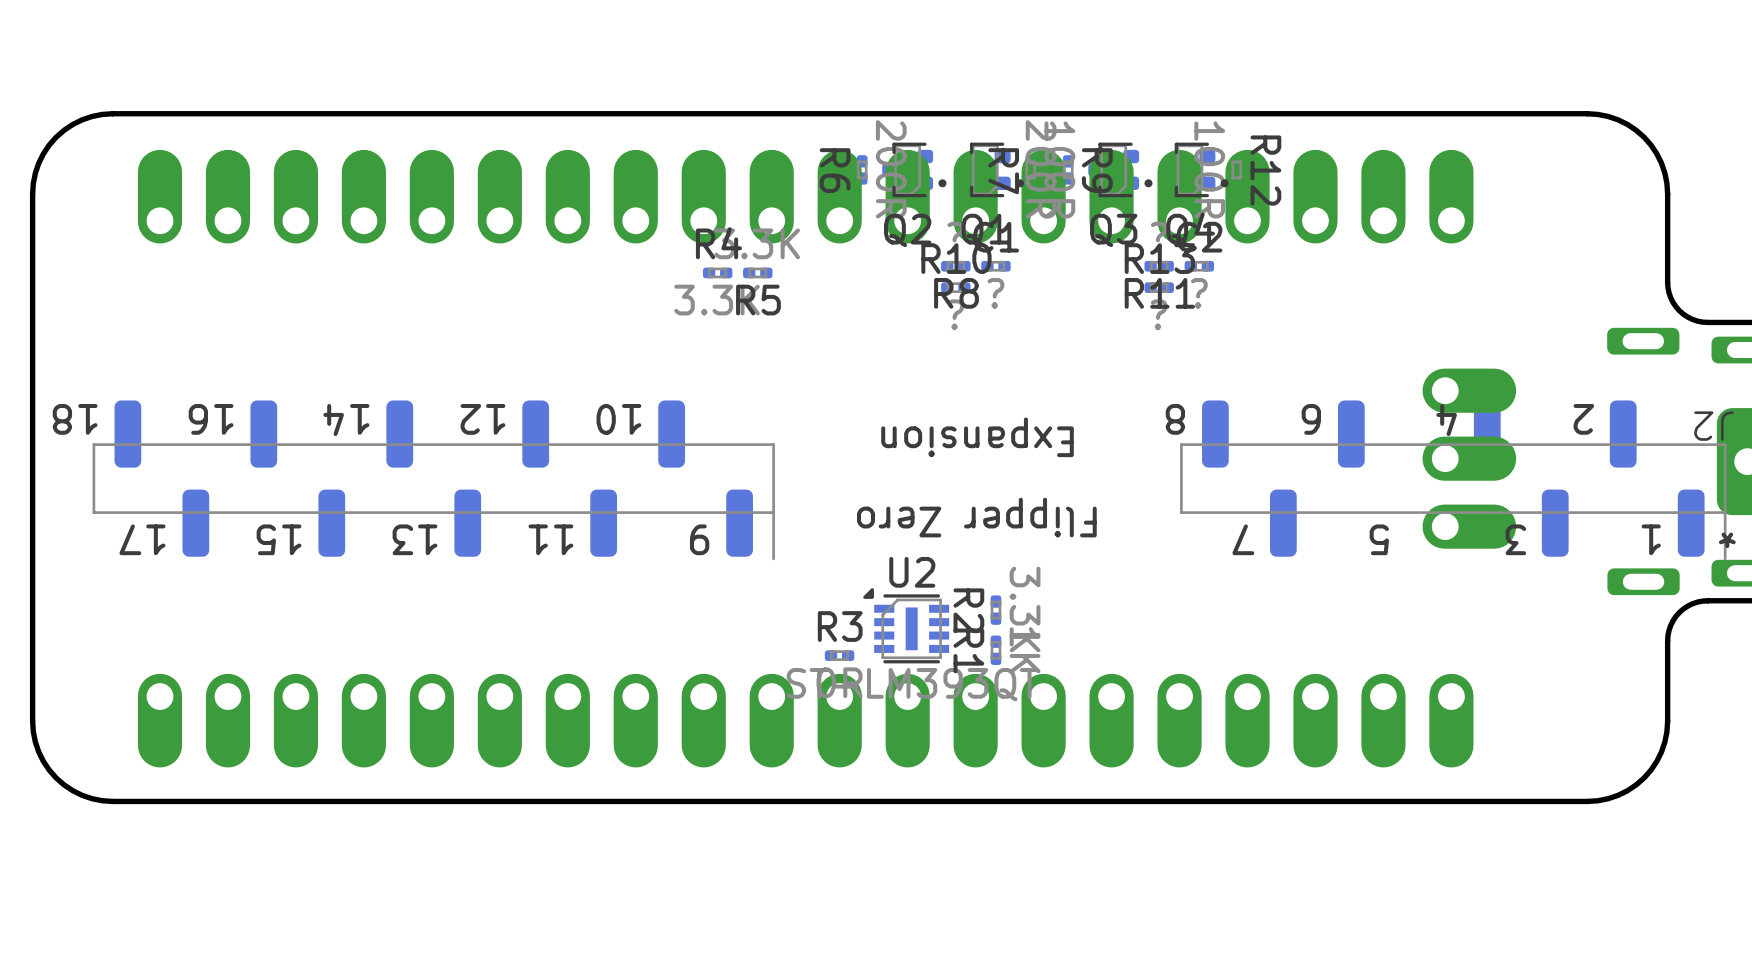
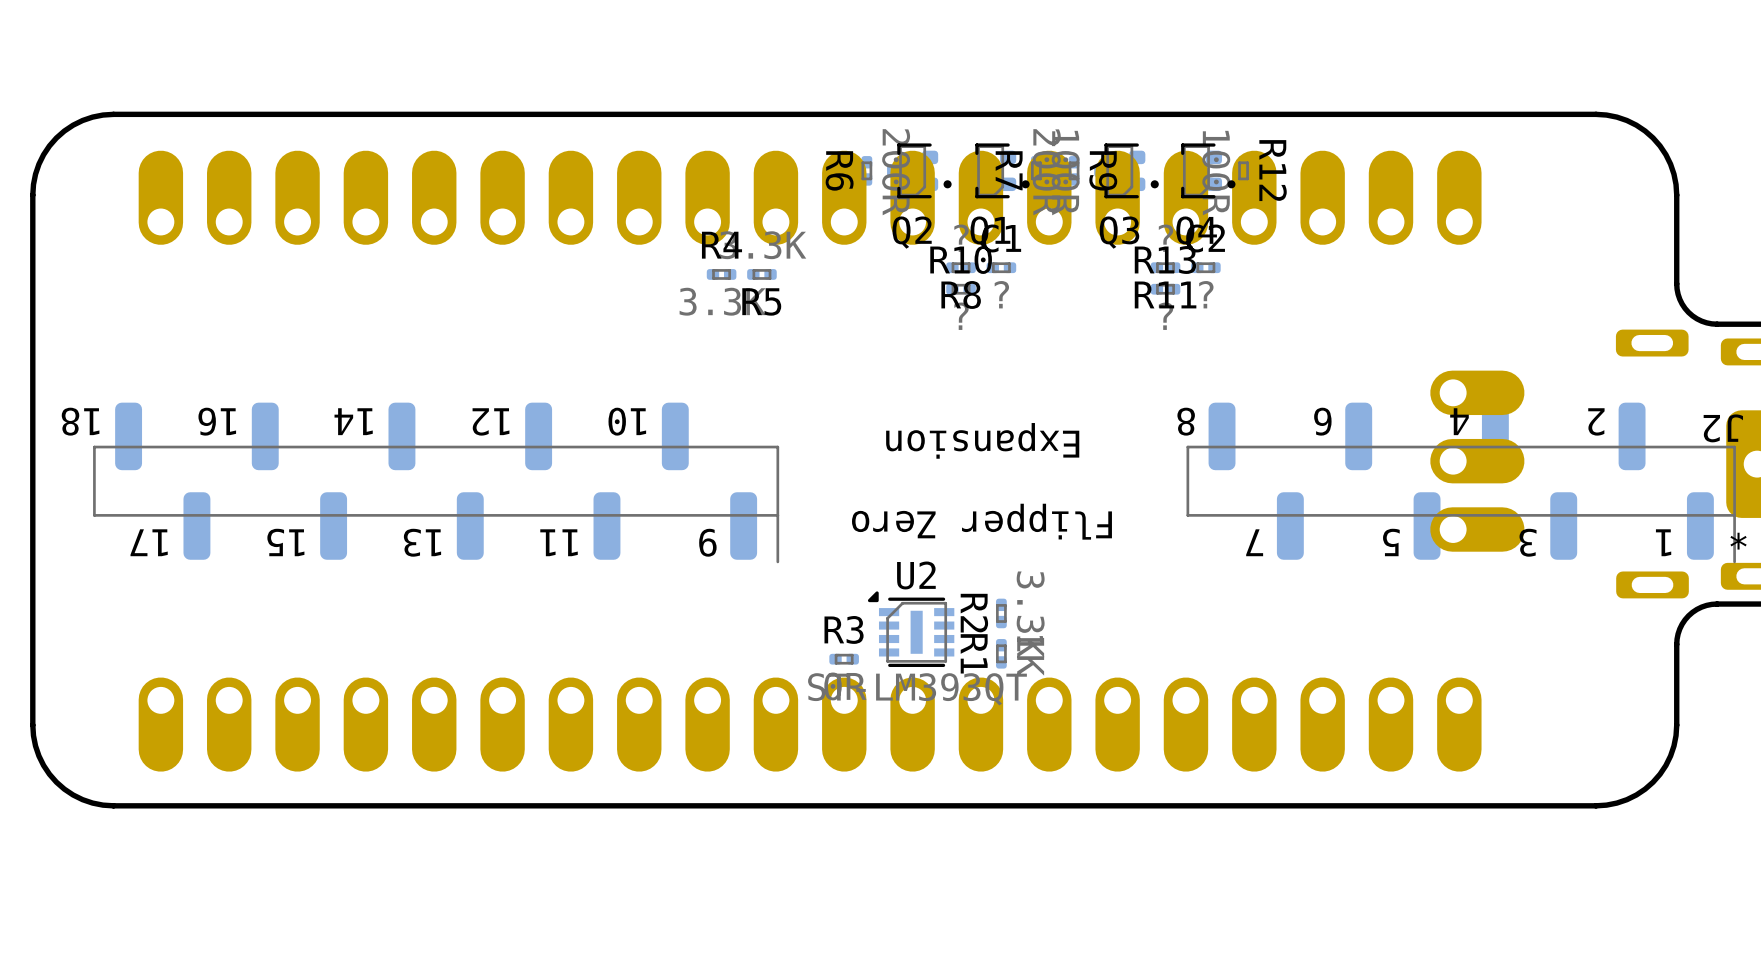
J2 footprint: [92, 400, 1727, 561] -> [93, 402, 1736, 564]

